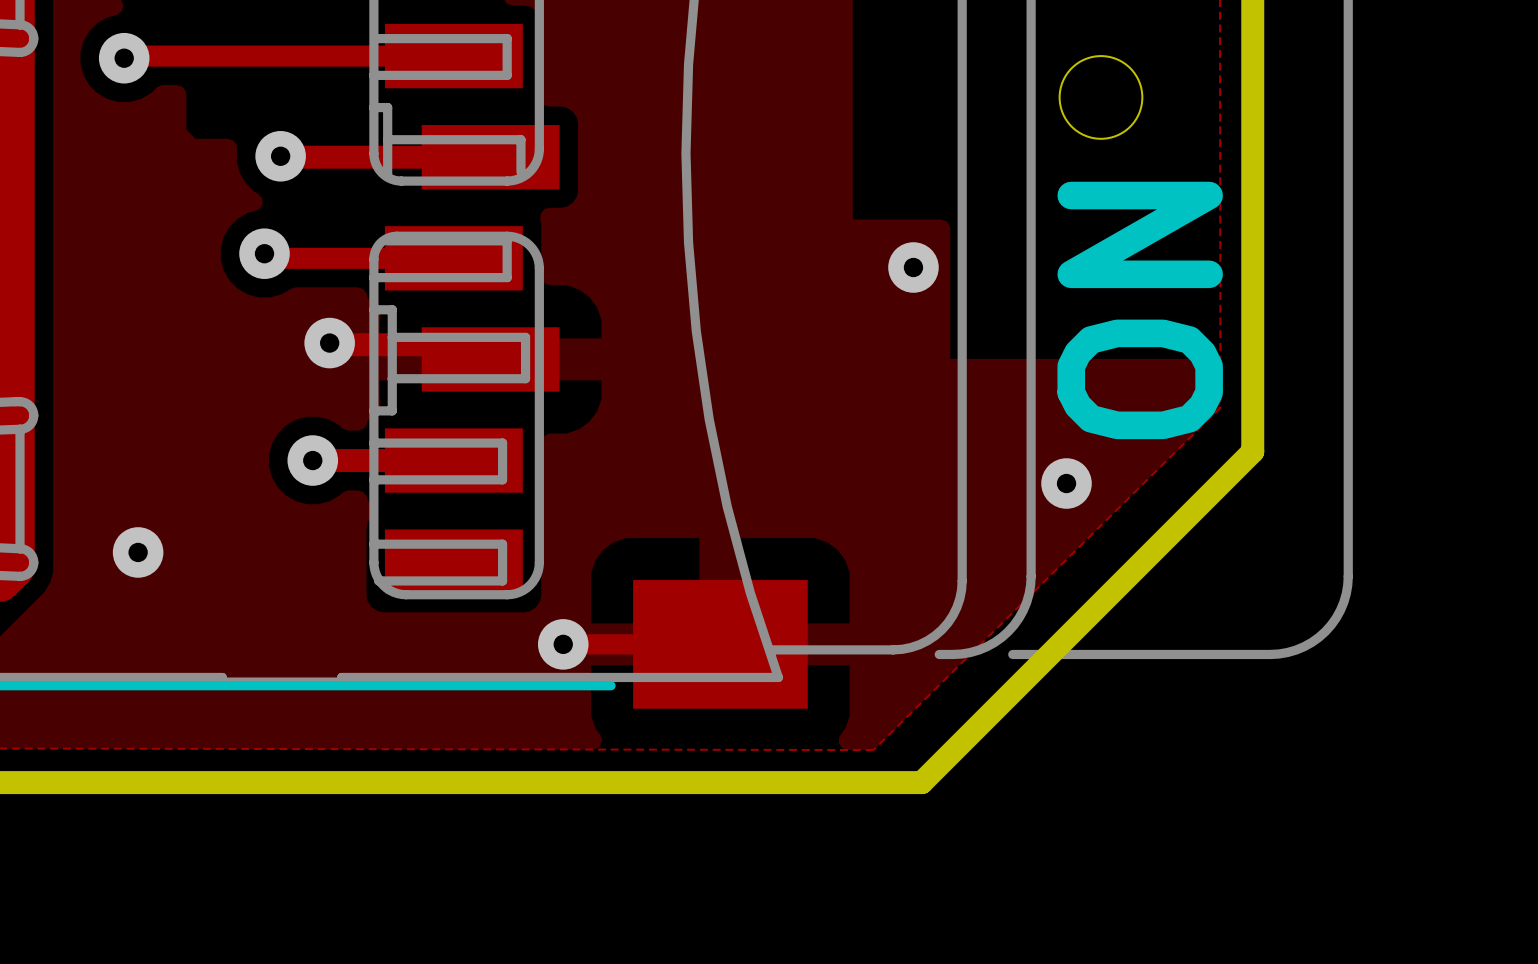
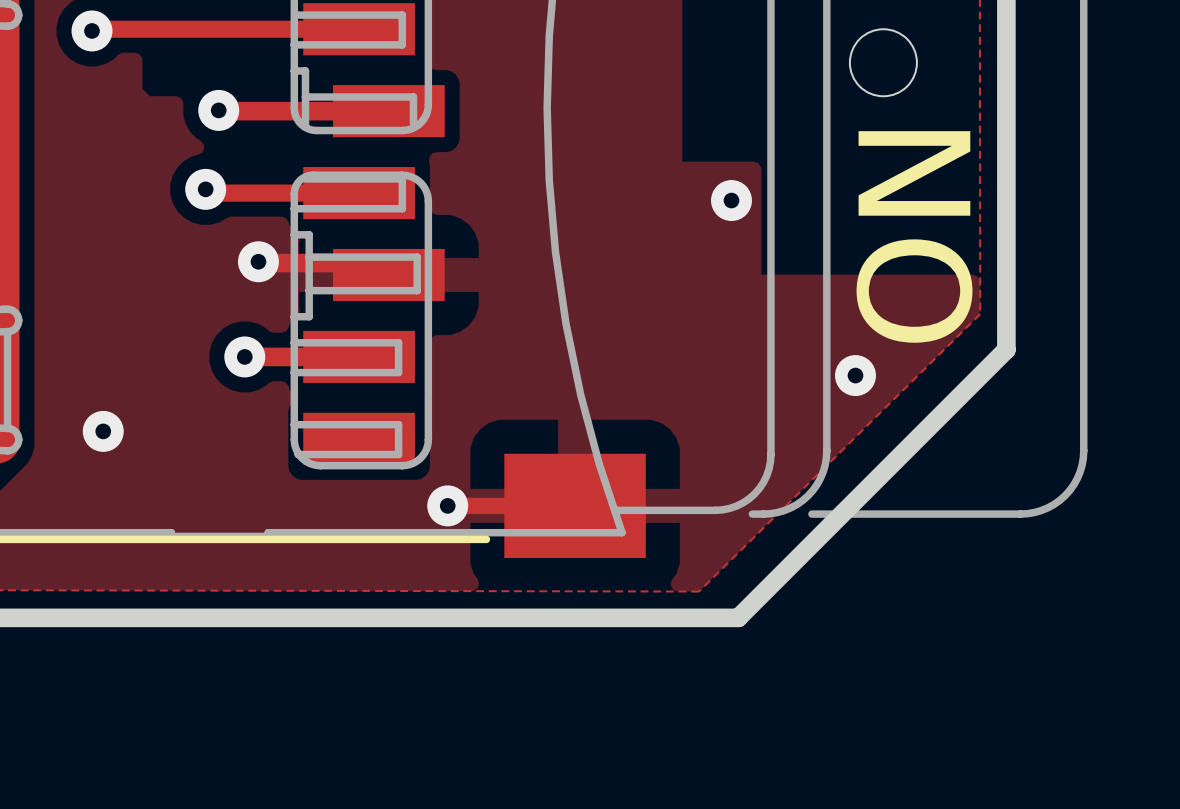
text position: ON (1140, 310) -> ON (914, 236)

